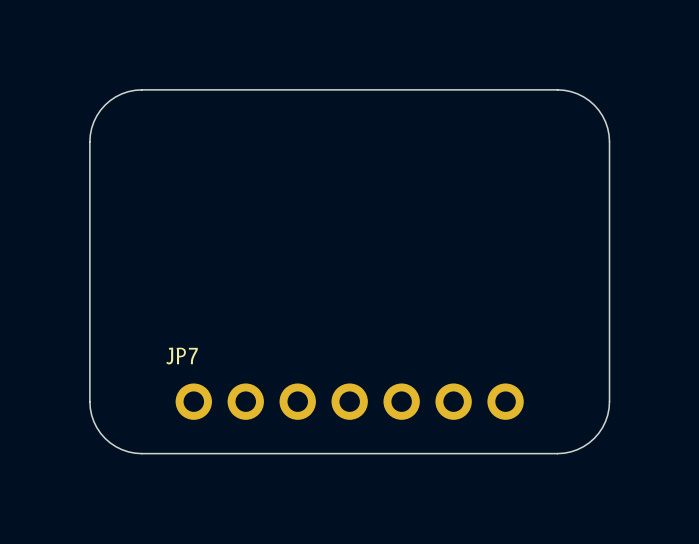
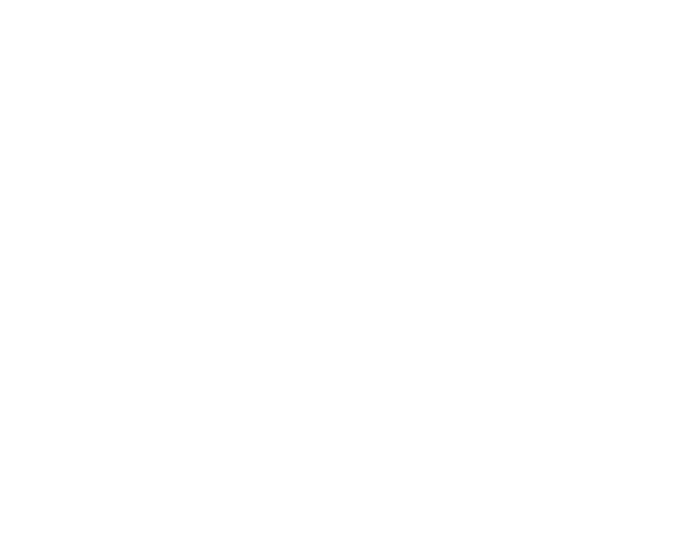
board edge: (141, 89) (557, 89) (571, 91) (589, 100) (598, 110) (605, 121) (609, 141) (609, 401) (607, 415) (598, 433) (589, 442) (577, 449) (557, 453) (141, 453) (128, 451) (110, 442) (100, 433) (93, 421) (89, 401) (90, 135) (93, 121) (105, 105) (121, 93) (141, 89) -> none
JP7: (349, 401) -> none

